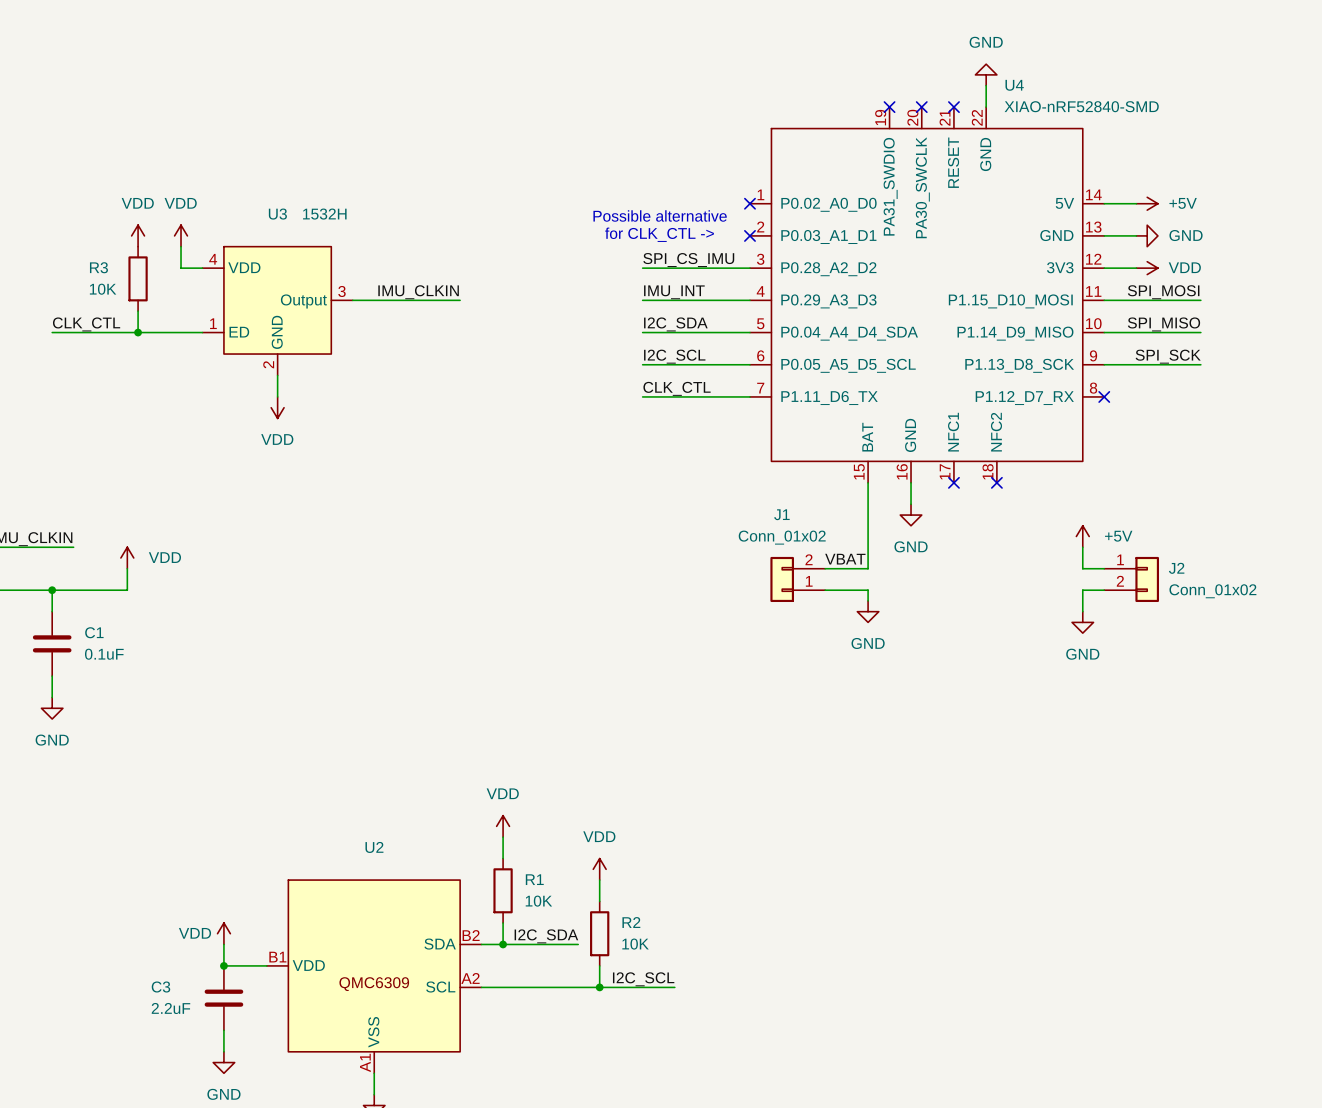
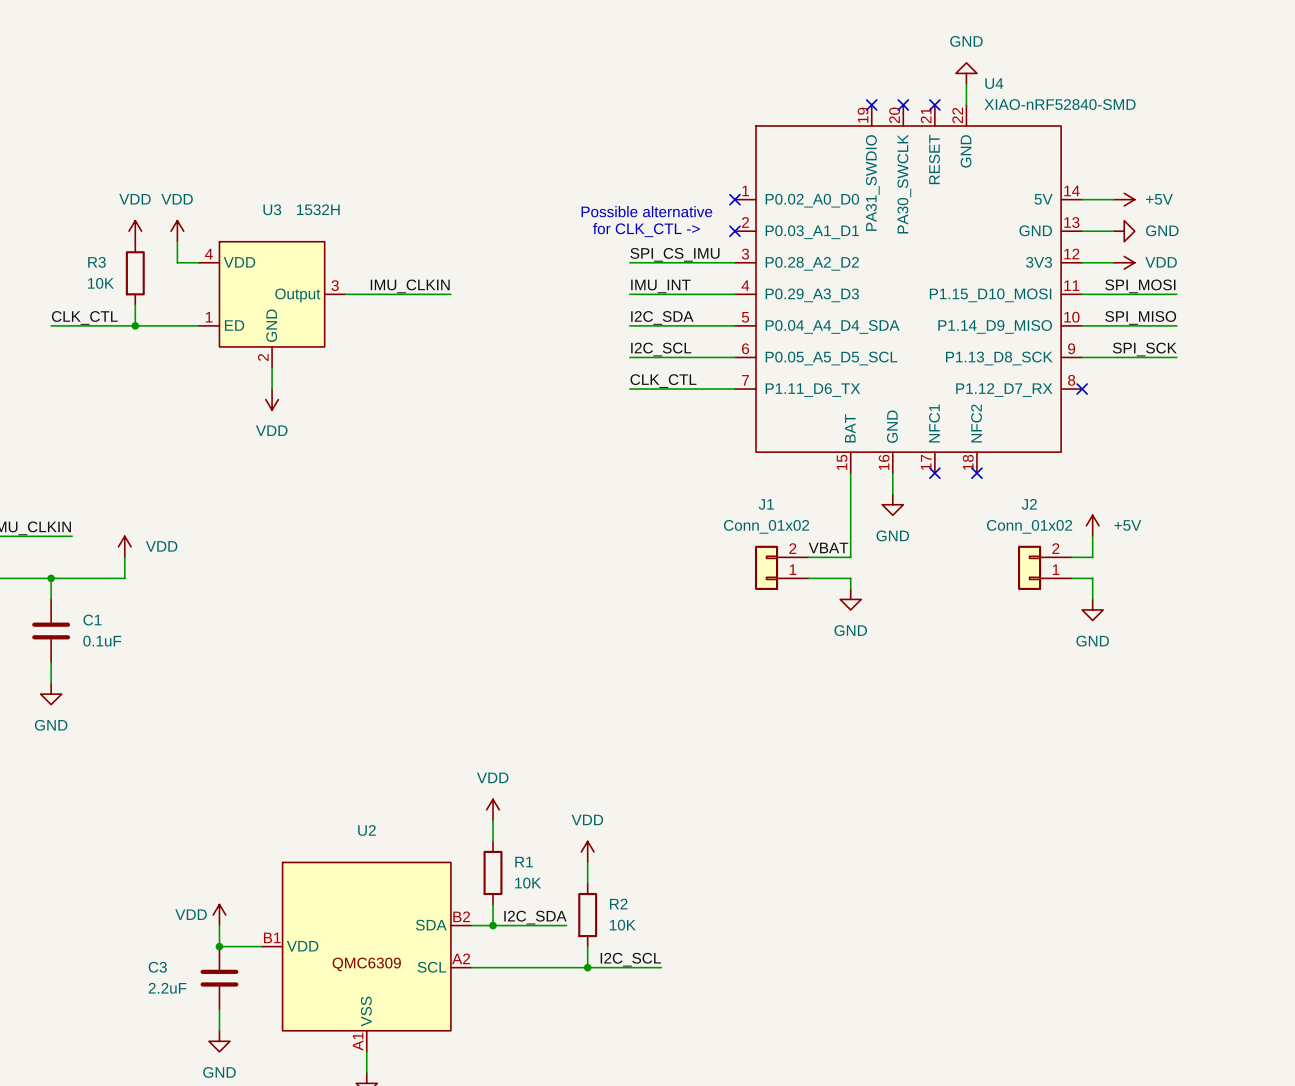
power symbol position: +5V (1082, 536) -> +5V (1092, 525)
wire: none -> (1092, 536) (1092, 557) (1082, 557)
J2 name position: J2 (1176, 568) -> J2 (1029, 504)
J2 position: (1131, 579) -> (1044, 567)
J2 rotation: 0° (1147, 579) -> 180° (1029, 567)
wire: (1093, 590) (1082, 590) (1082, 611) -> none
wire: none -> (1082, 578) (1092, 578) (1092, 599)
J2 value position: Conn_01x02 (1212, 591) -> Conn_01x02 (1029, 526)
power symbol position: GND (1082, 622) -> GND (1092, 609)

